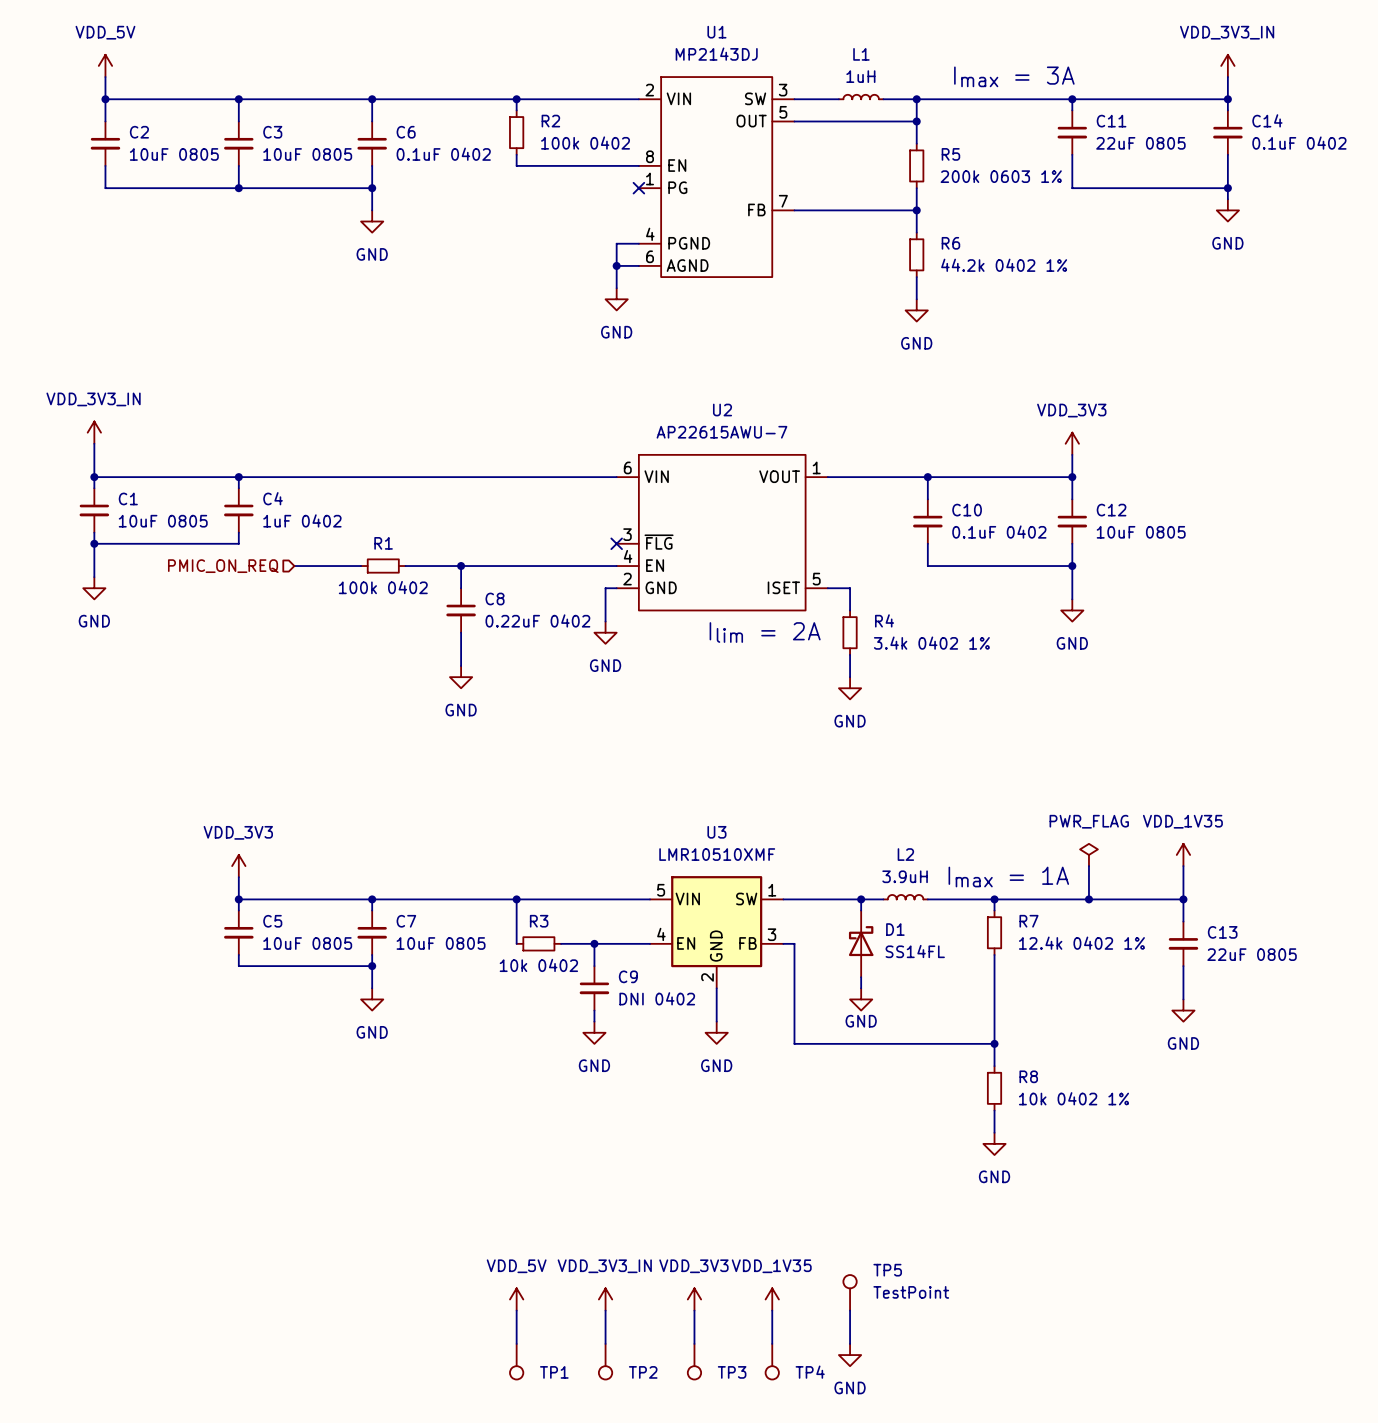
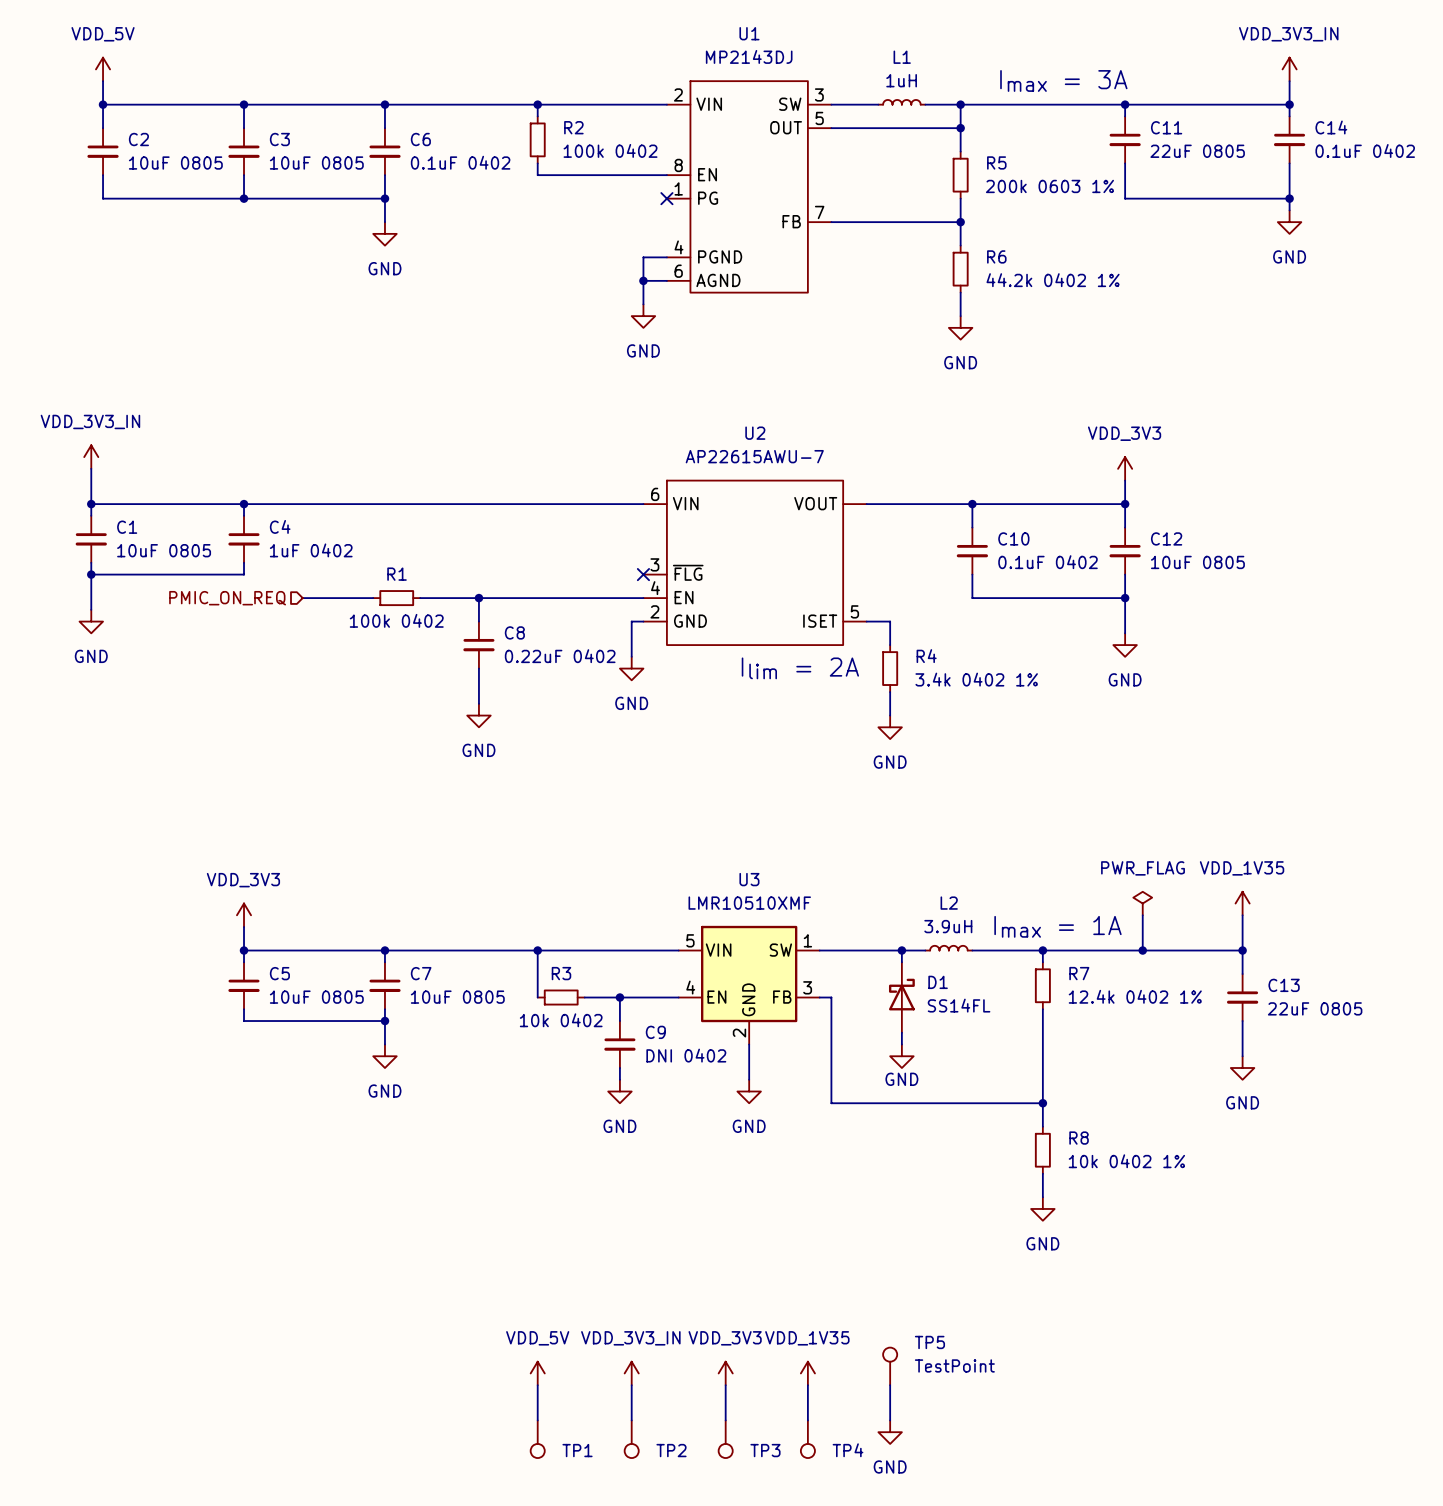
U2 pin number: 1 (816, 467) -> none

